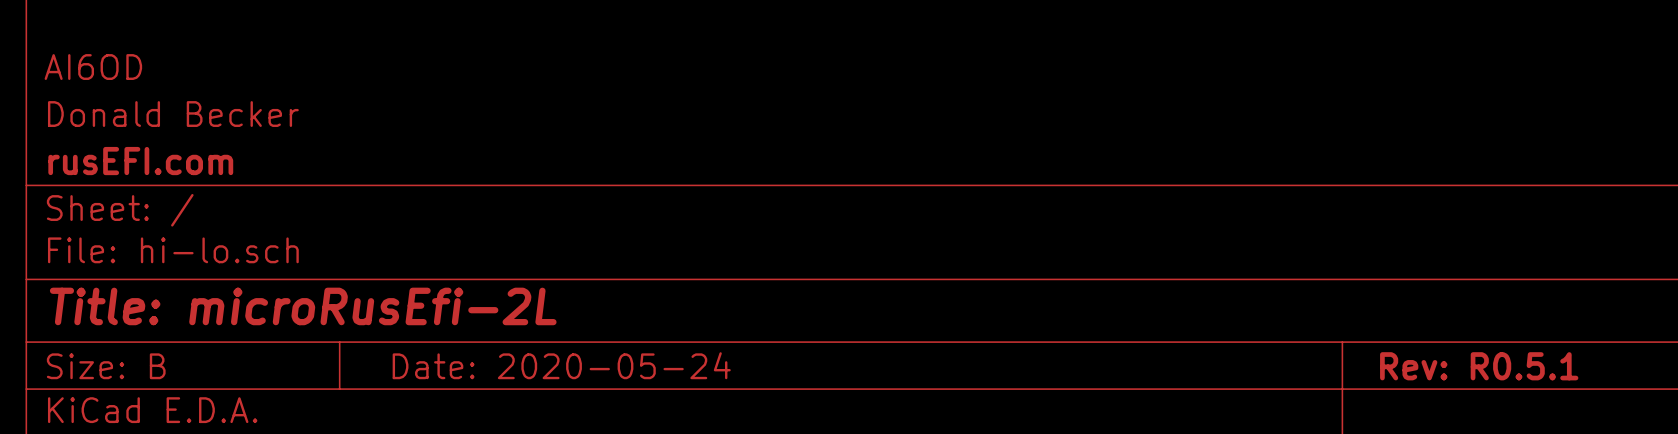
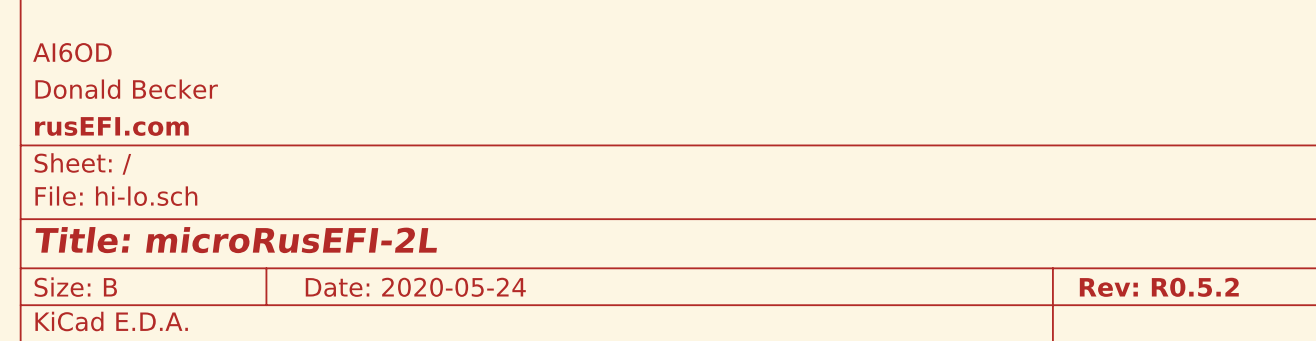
title block: Title: microRusEfi-2L (303, 306) -> Title: microRusEFI-2L (236, 240)
title block: Rev: R0.5.1 (1479, 366) -> Rev: R0.5.2 (1159, 287)

